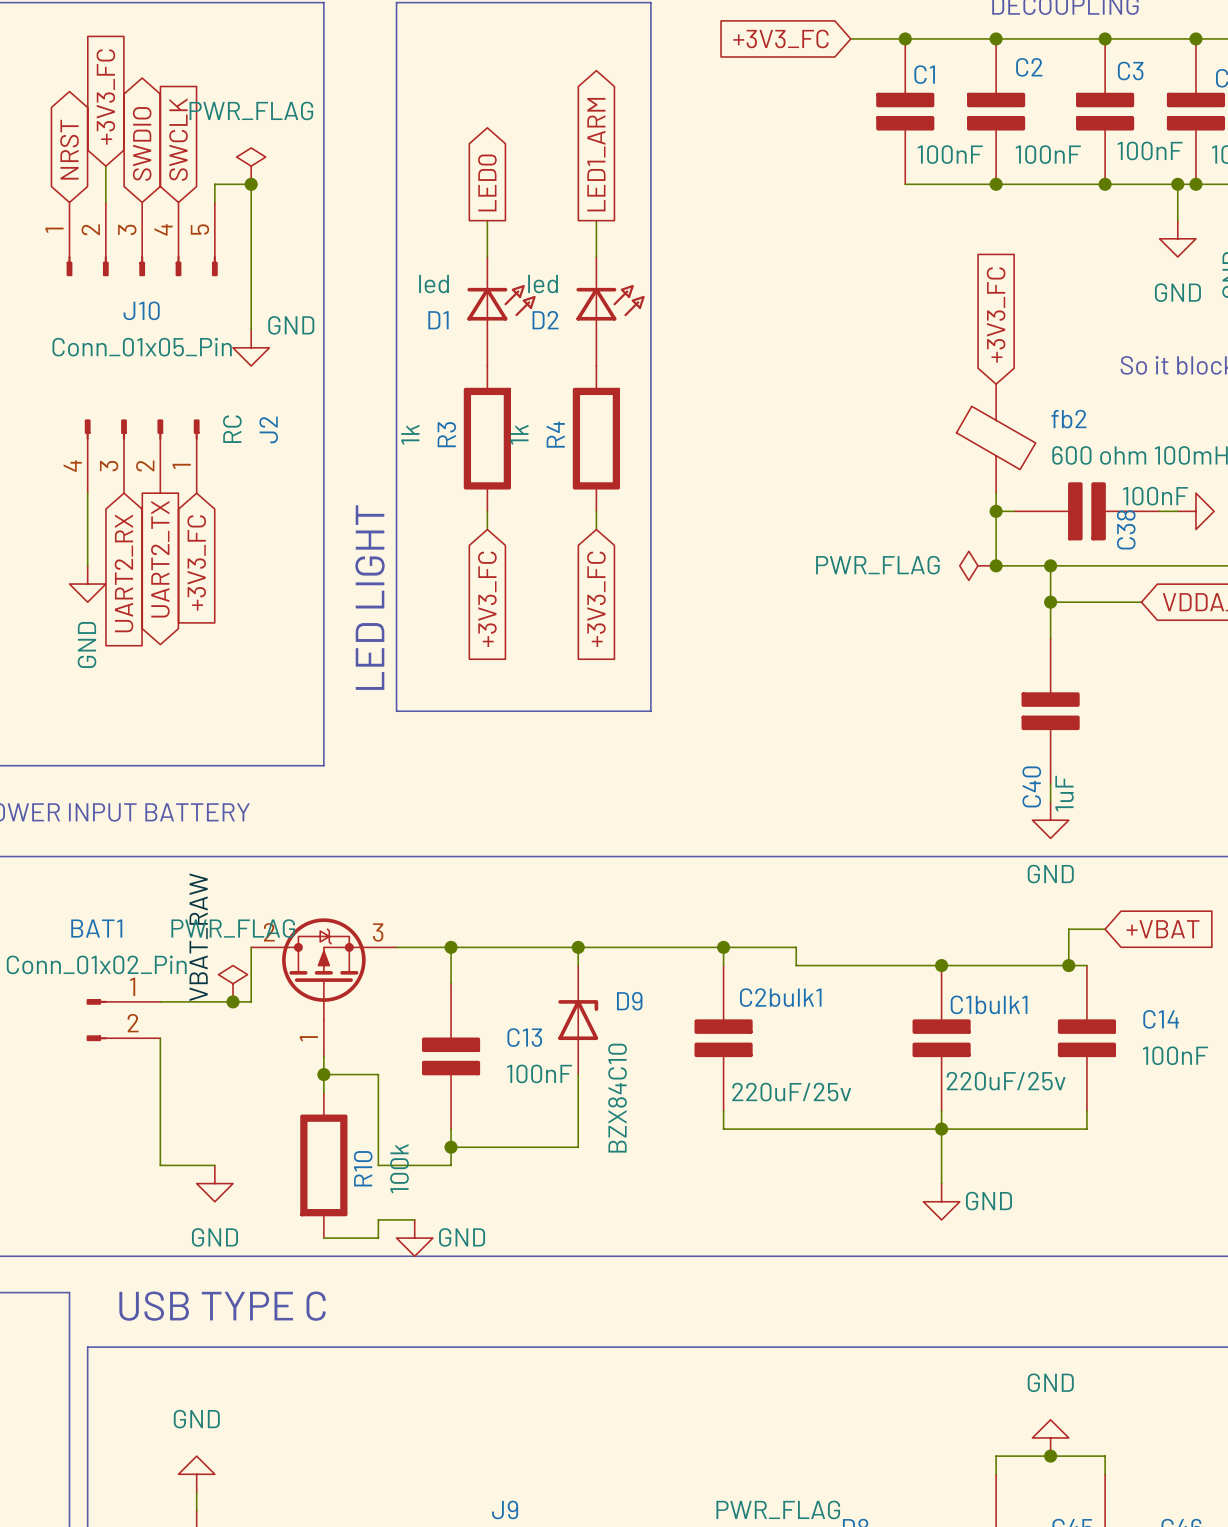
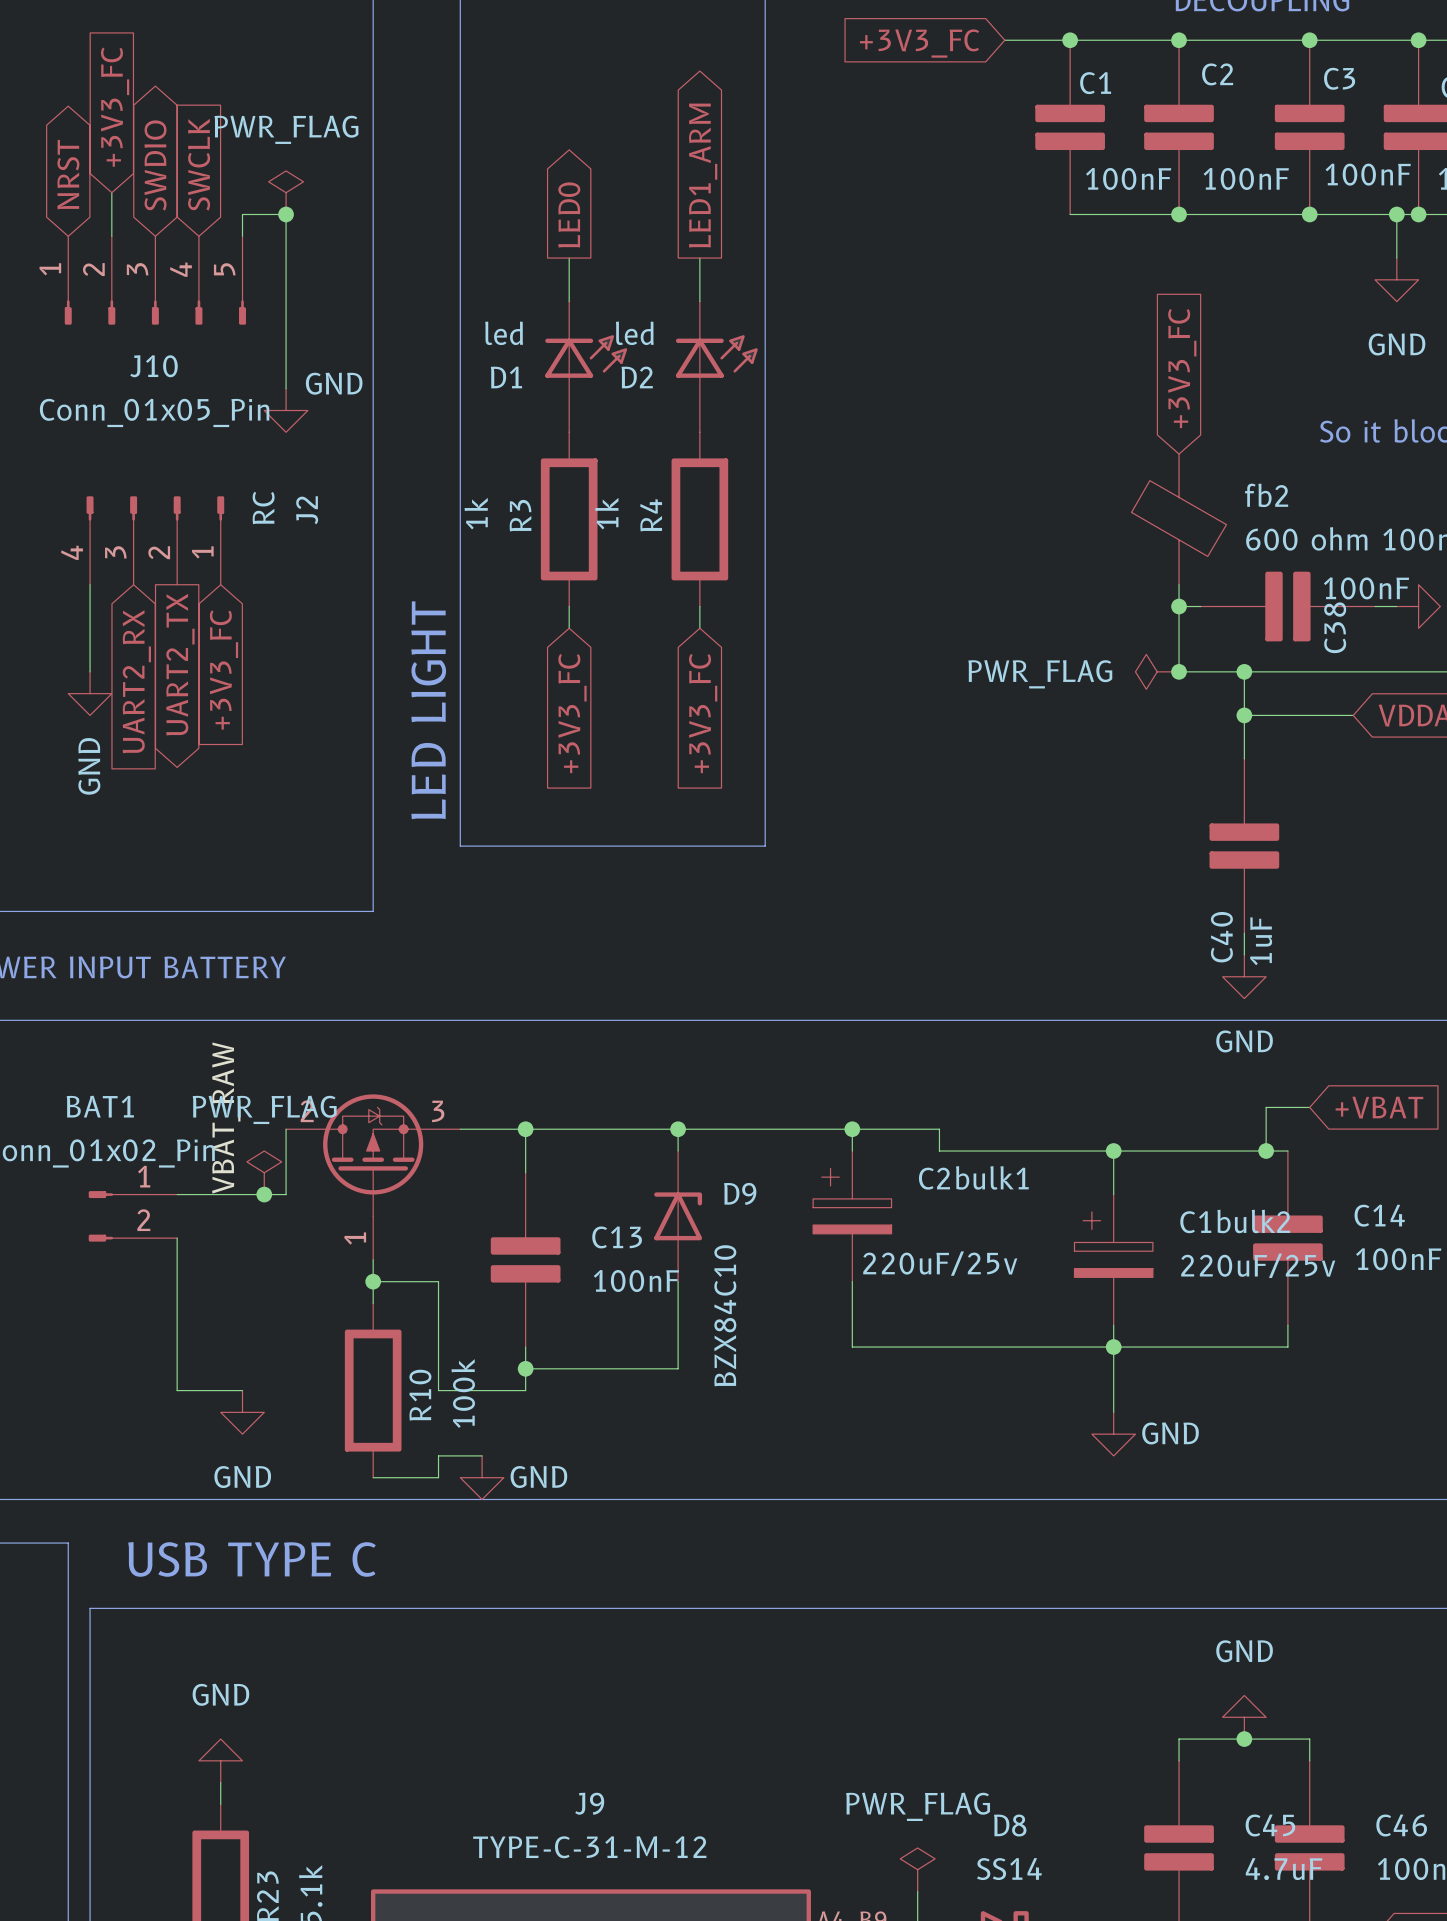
C2bulk1 symbol: [694, 965, 753, 1111] -> [813, 1151, 892, 1282]
C2bulk1 name position: C2bulk1 (780, 997) -> C2bulk1 (973, 1177)
C1bulk1: 220uF/25v (941, 1038) -> none
C1bulk2: none -> 220uF/25v (1113, 1259)

